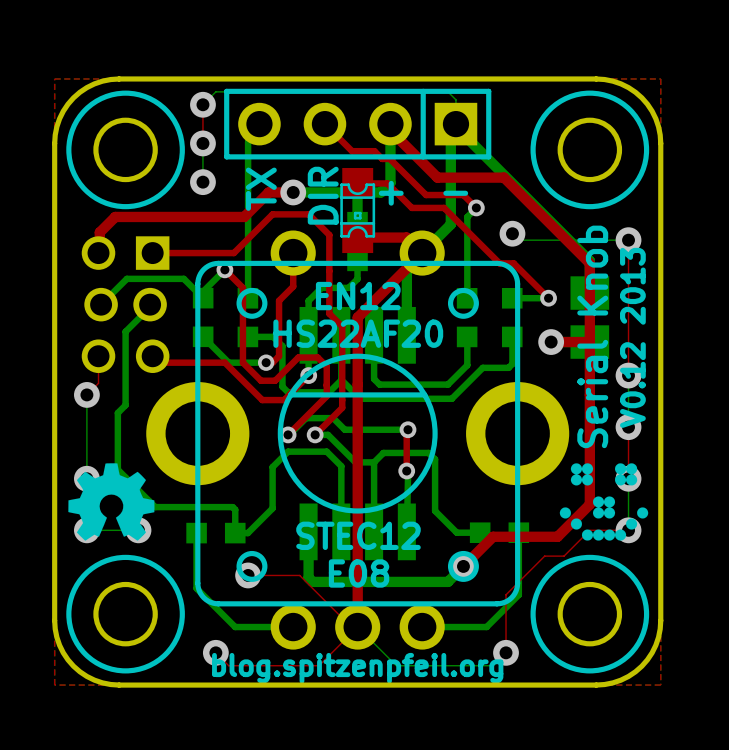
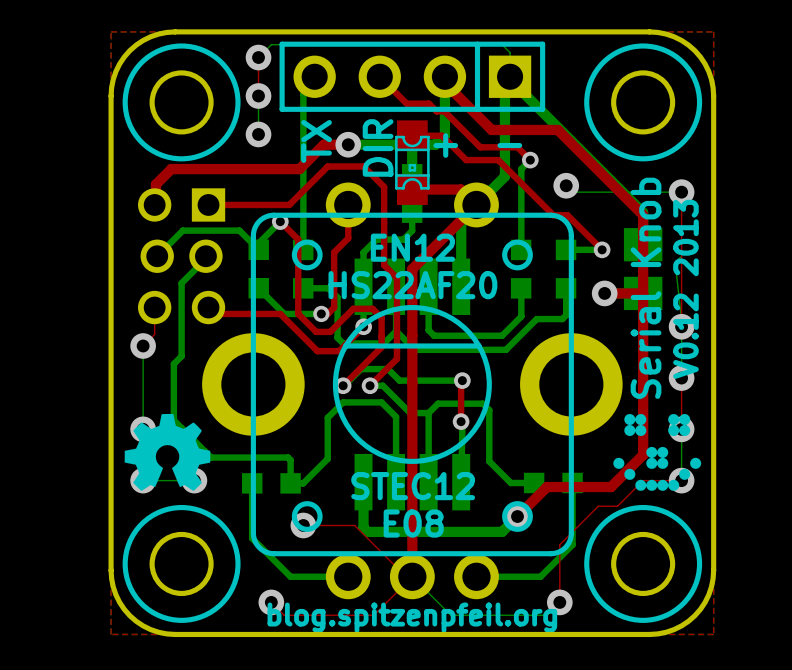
bottom track: none -> (681, 256) (675, 262) (681, 326)

